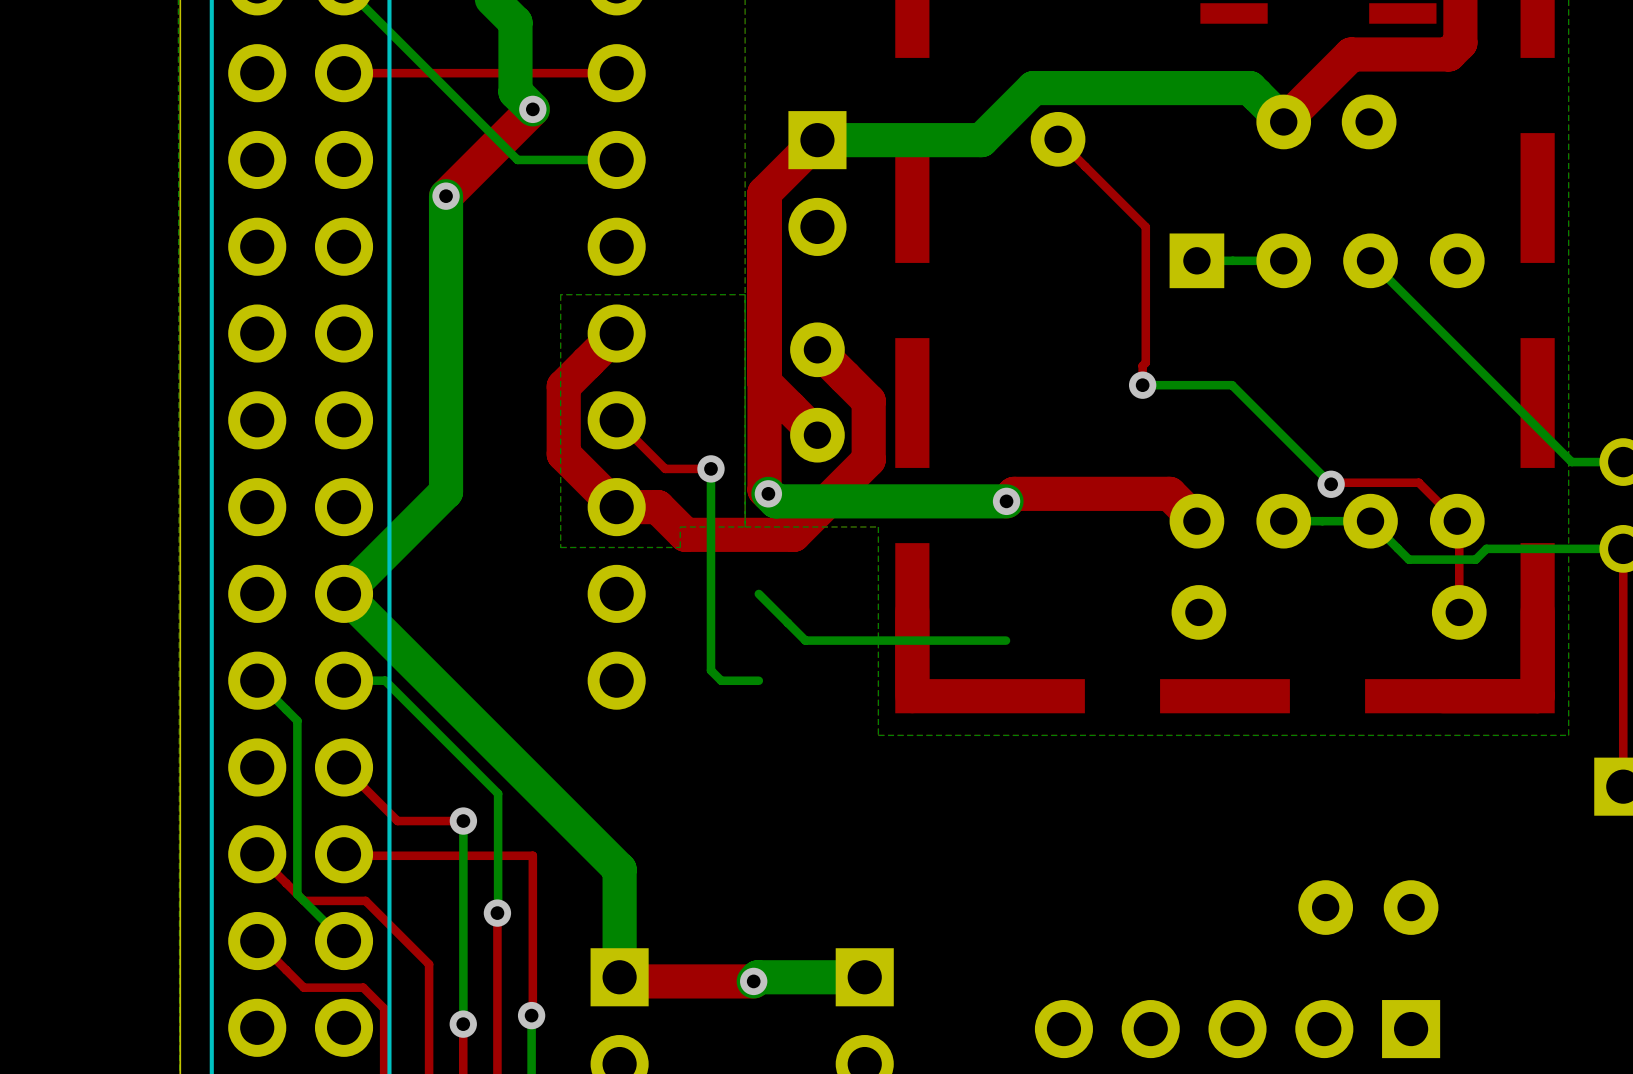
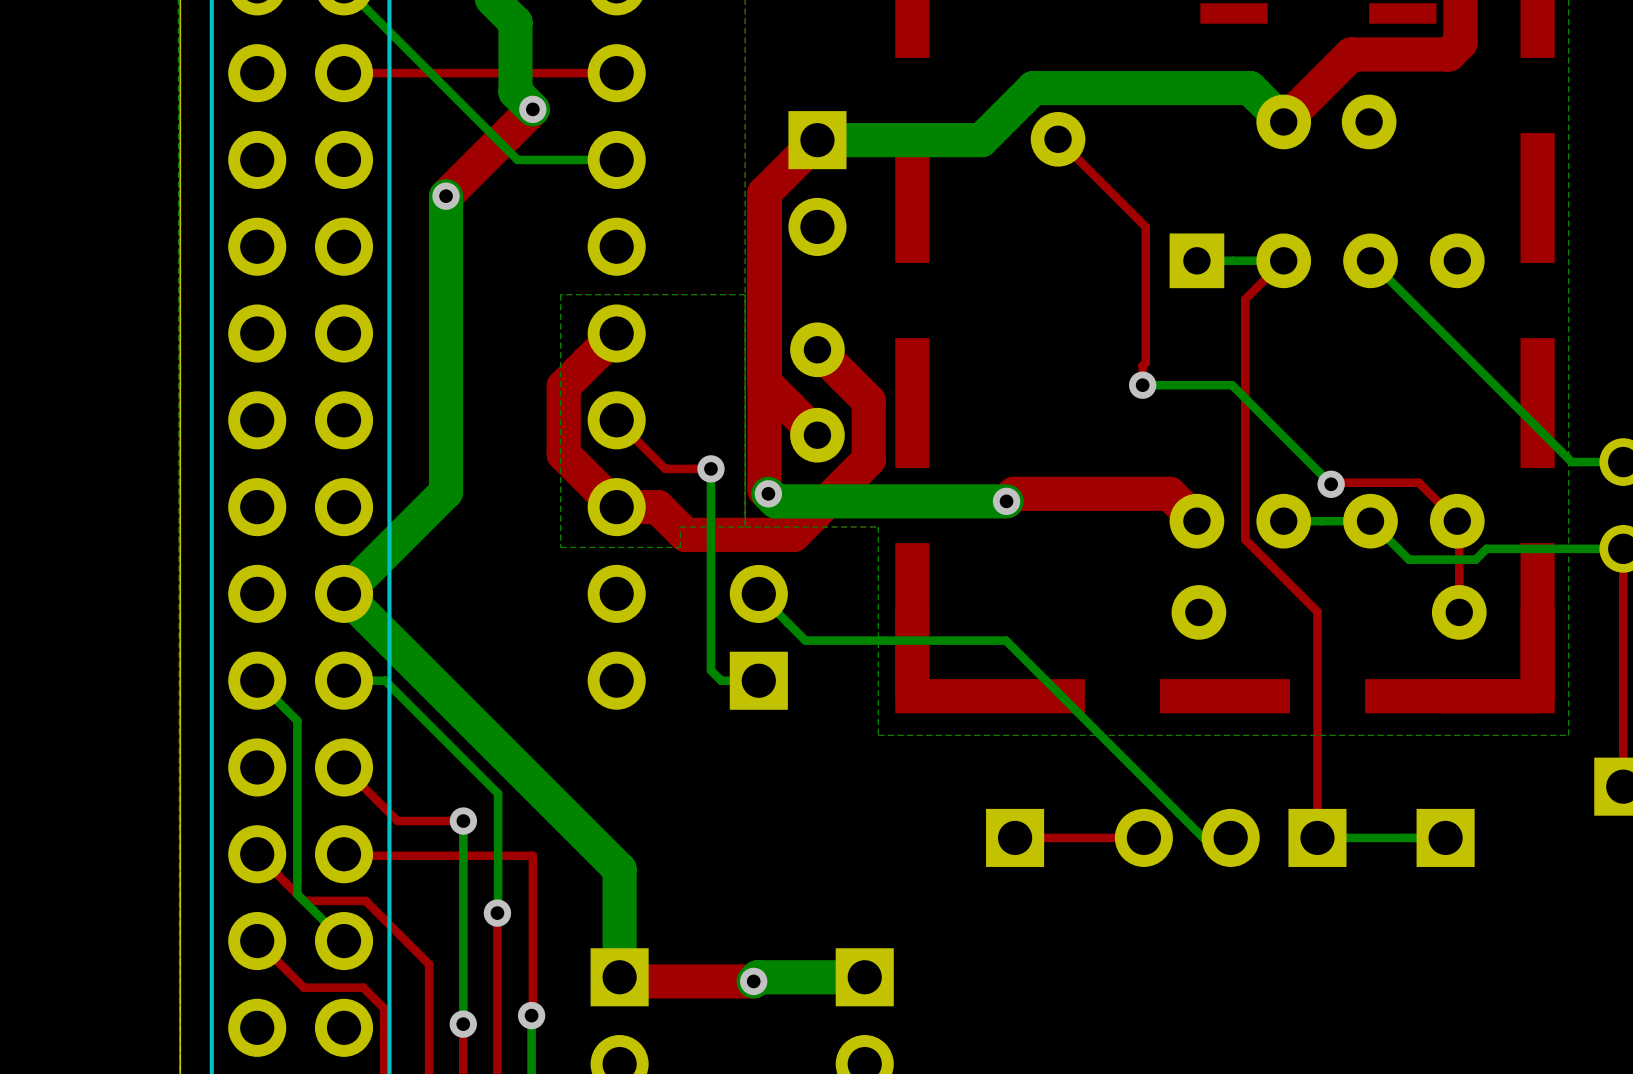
top track: none -> (1283, 260) (1245, 299) (1245, 539) (1317, 611) (1317, 837)
part: none -> (758, 637)
bottom track: none -> (1006, 640) (1203, 837) (1230, 837)
part: none -> (1015, 837)
top track: none -> (1143, 837) (1015, 837)
part: none -> (1230, 837)
bottom track: none -> (1445, 837) (1317, 837)
part: none -> (1445, 837)
part: (1368, 907) -> none
part: (1237, 1029) -> none

